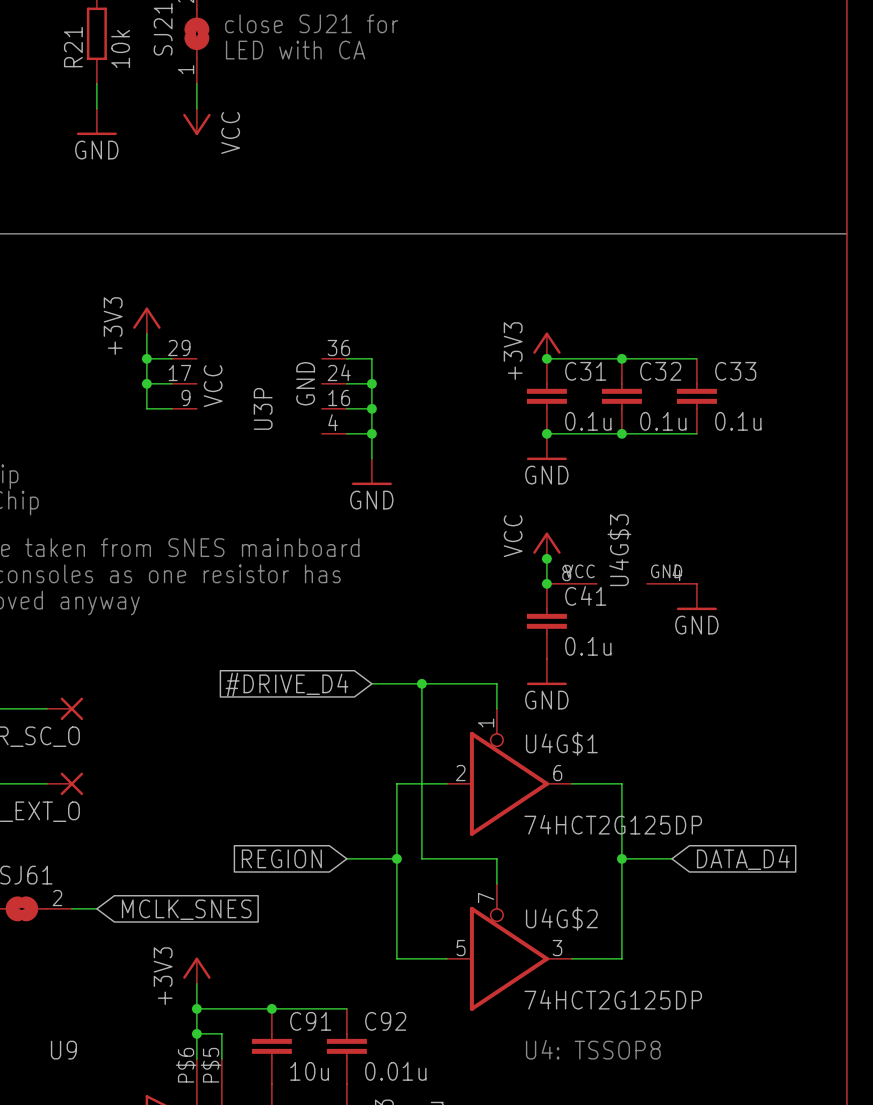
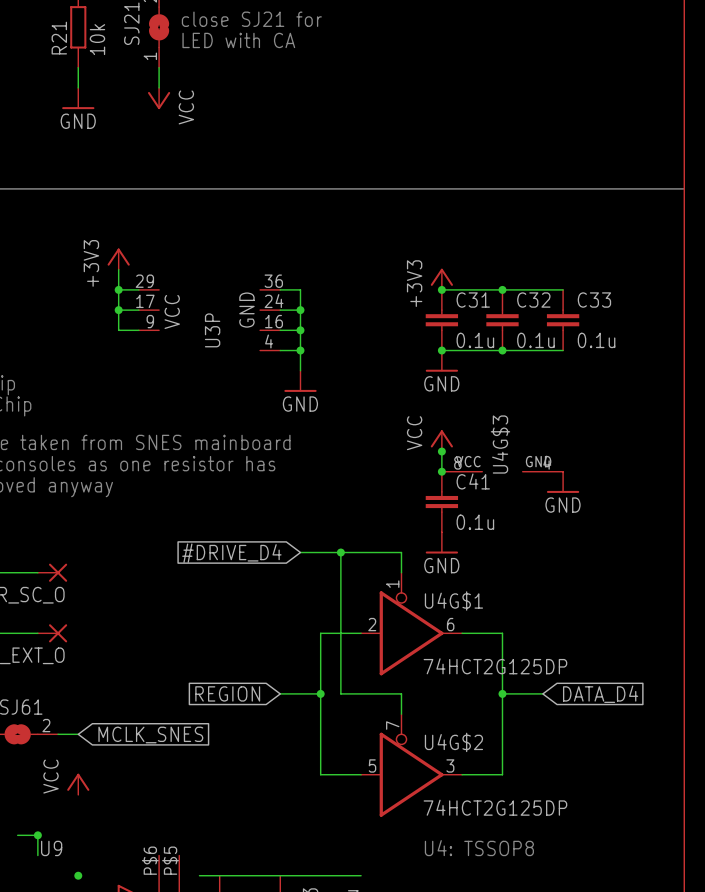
power symbol: none -> VCC (78, 784)
power symbol: +3V3 (196, 970) -> none
wire: (196, 983) (196, 1058) -> none
wire: (196, 1008) (346, 1008) -> none
junction: (196, 1008) -> none
junction: (271, 1008) -> none
junction: none -> (37, 835)
wire: (196, 1033) (221, 1033) (221, 1058) -> (17, 835) (37, 835) (37, 855)
junction: (196, 1033) -> none
C91: 10u (271, 1046) -> none
C92: 0.01u (346, 1046) -> none
junction: none -> (78, 875)
wire: none -> (199, 875) (361, 875)

